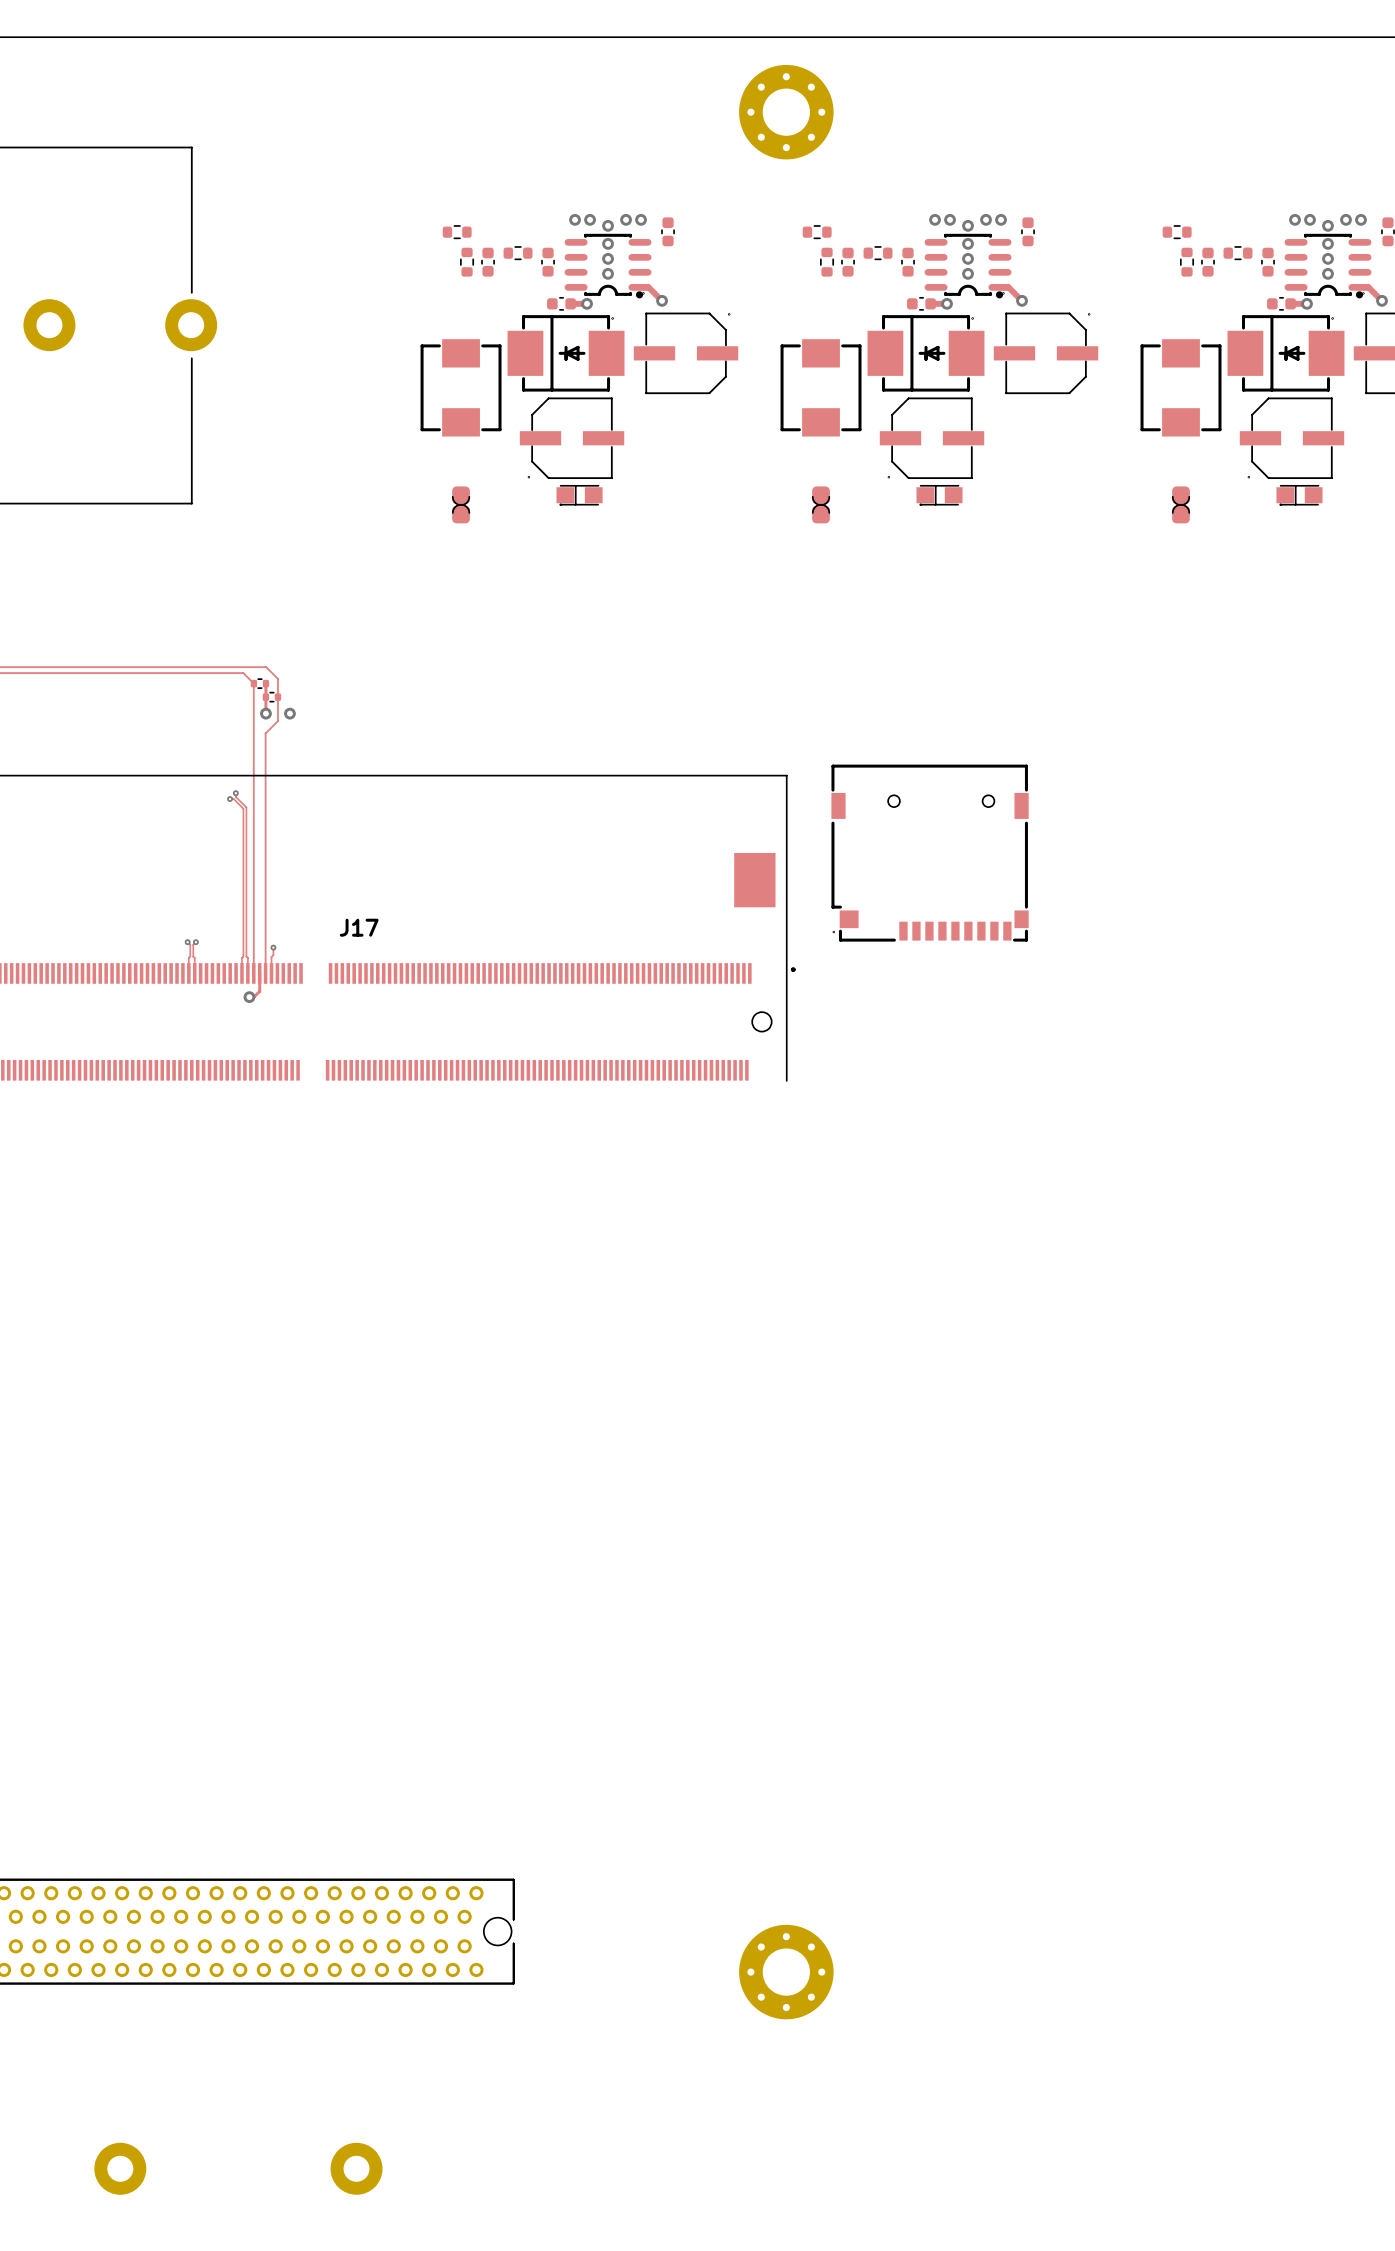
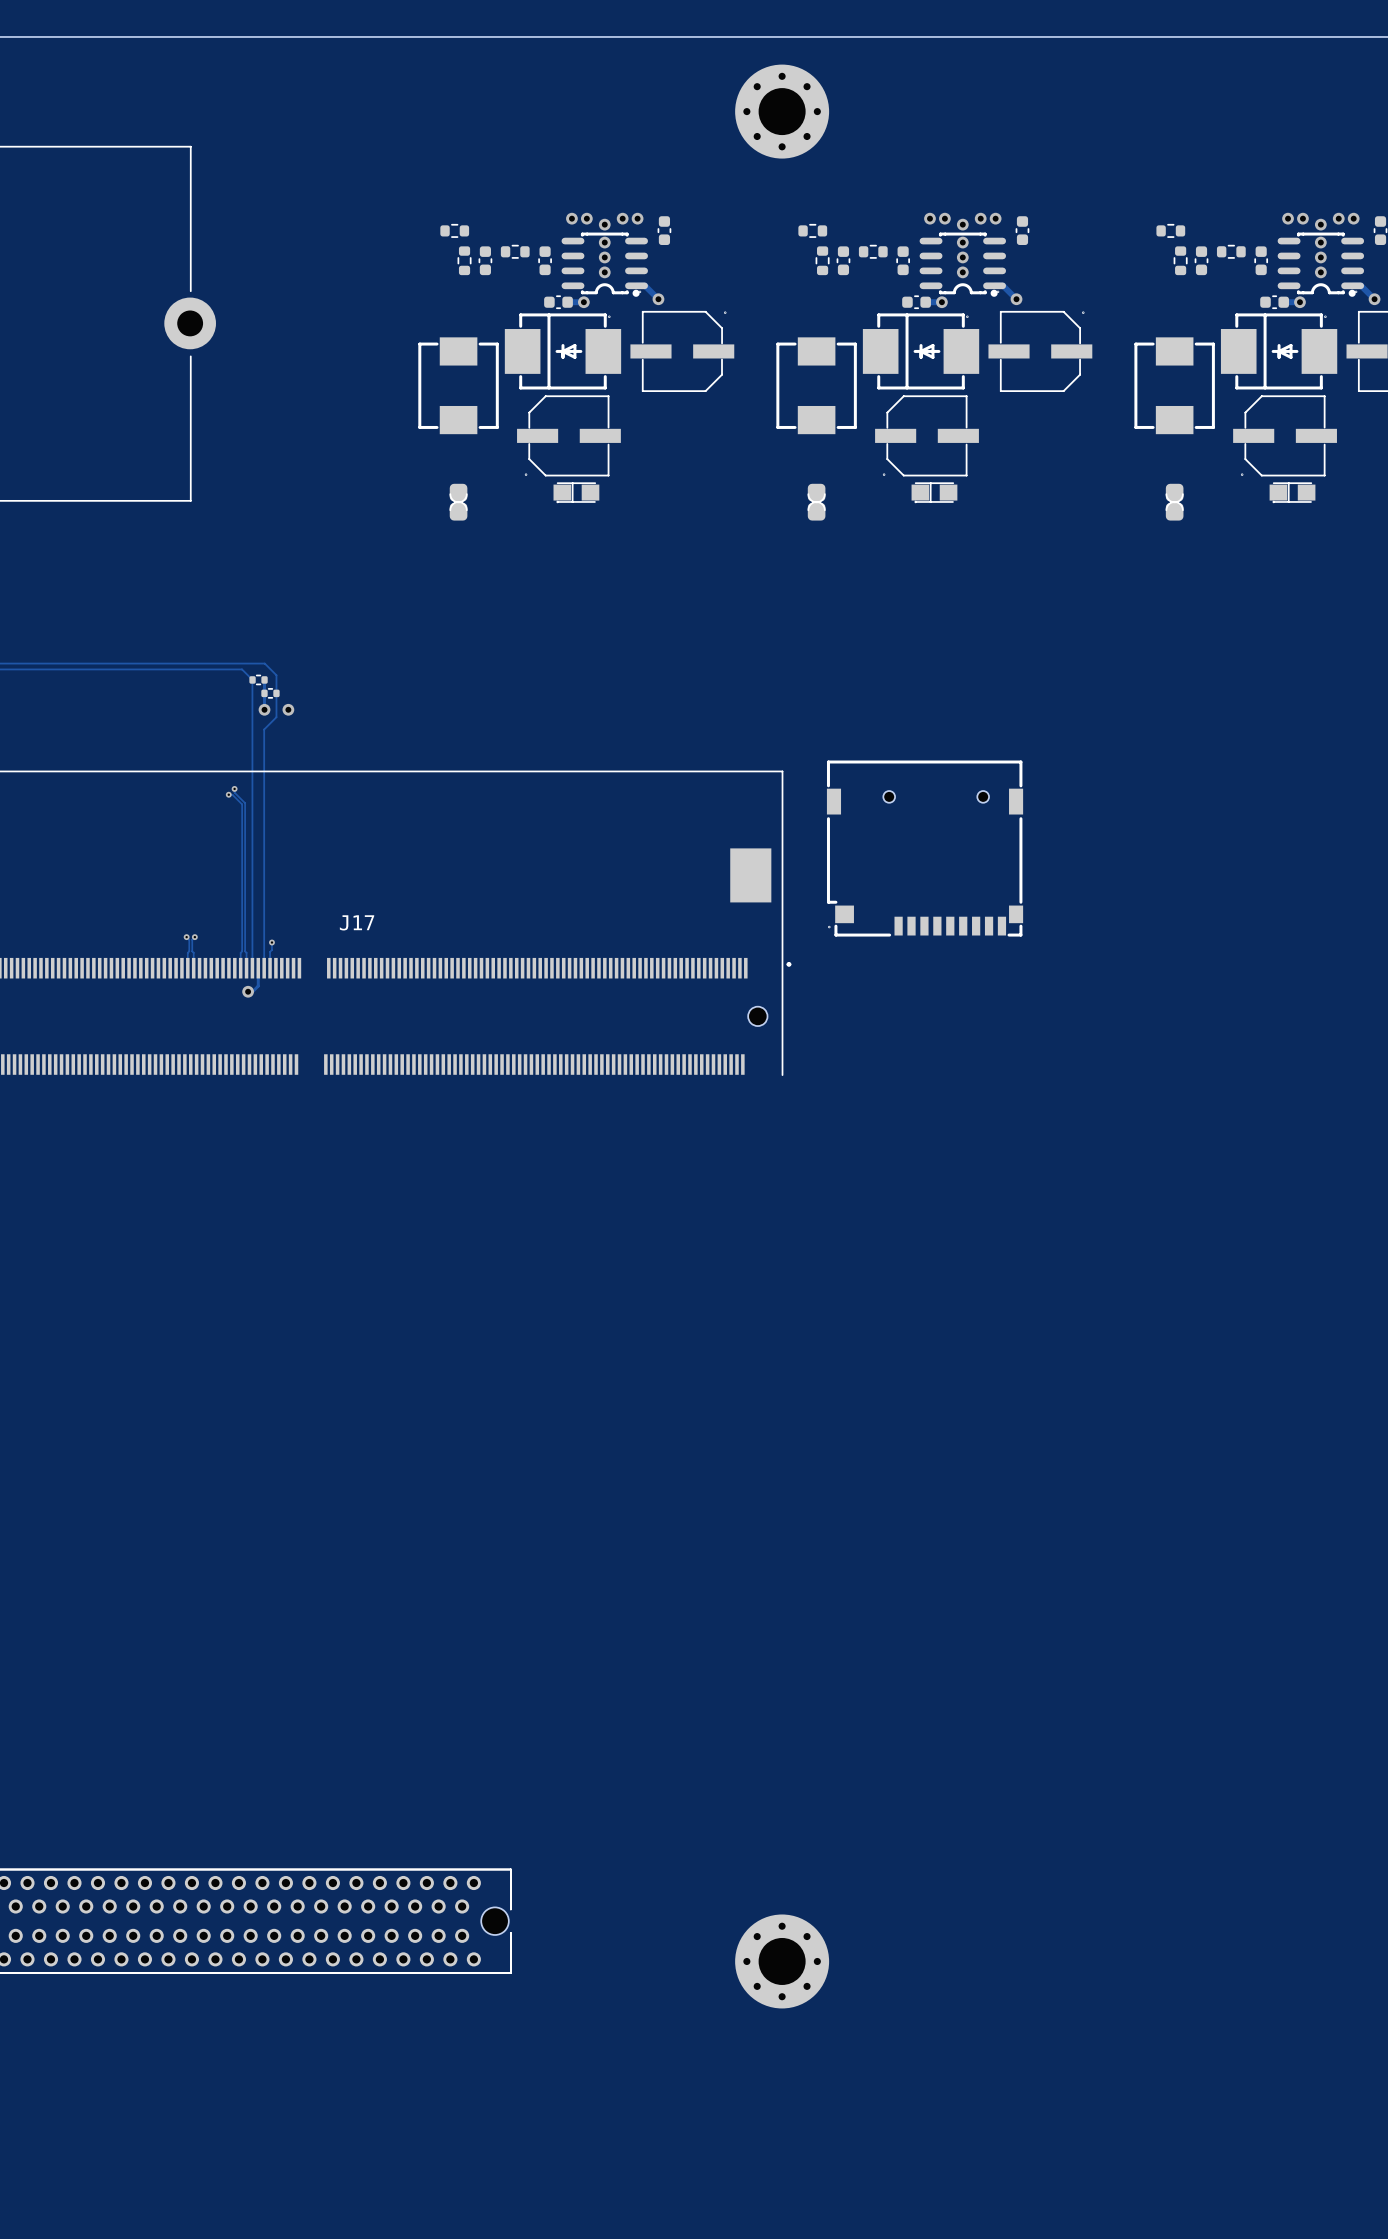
part: (49, 325) -> none
part: (120, 2168) -> none
part: (356, 2168) -> none

